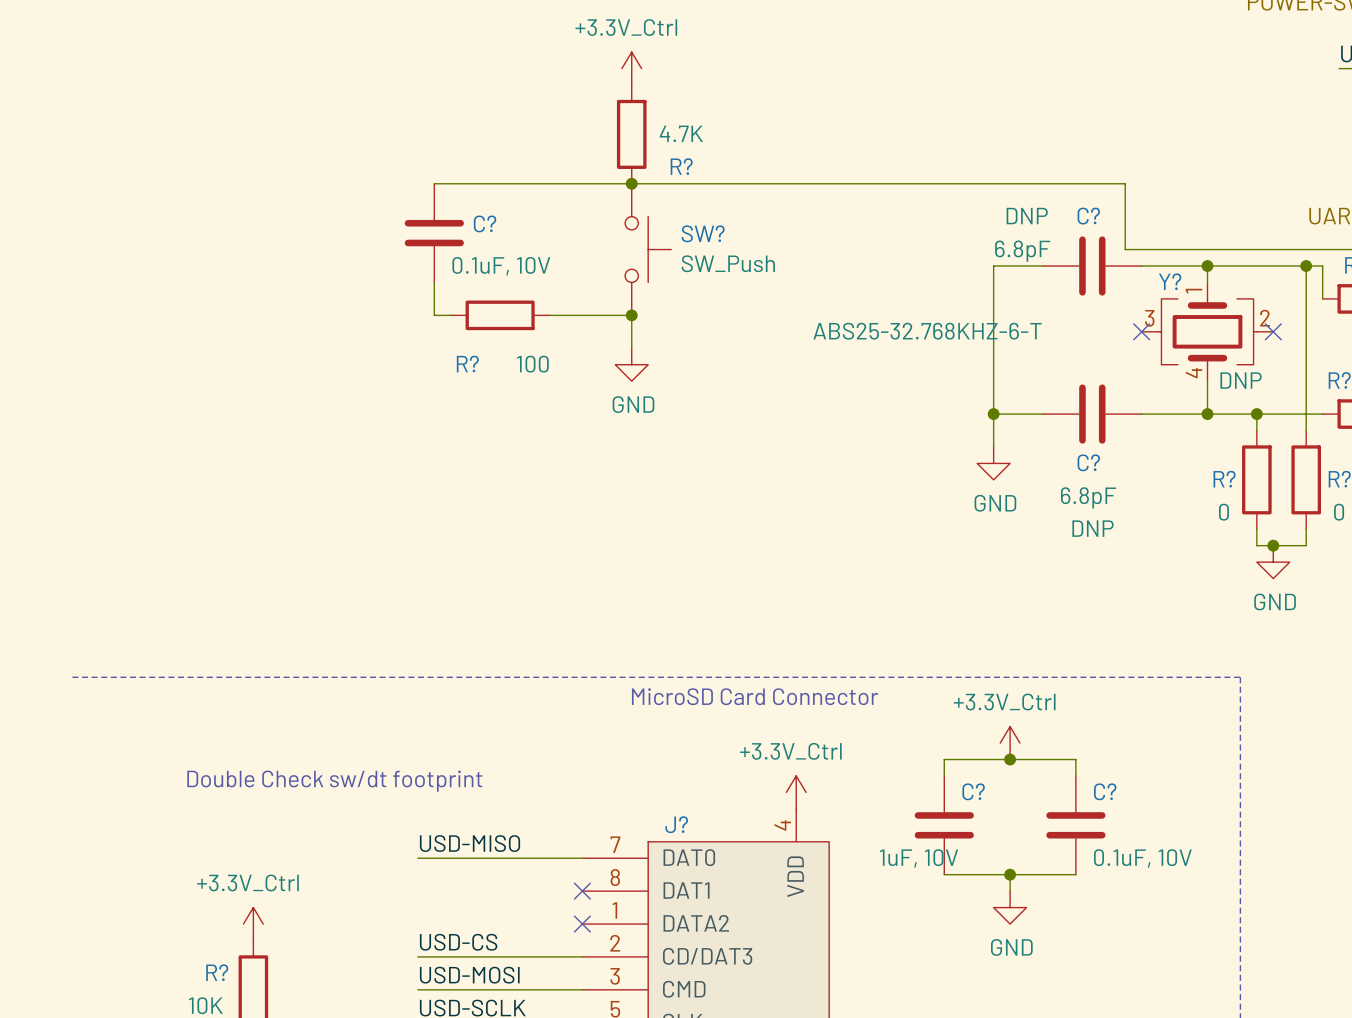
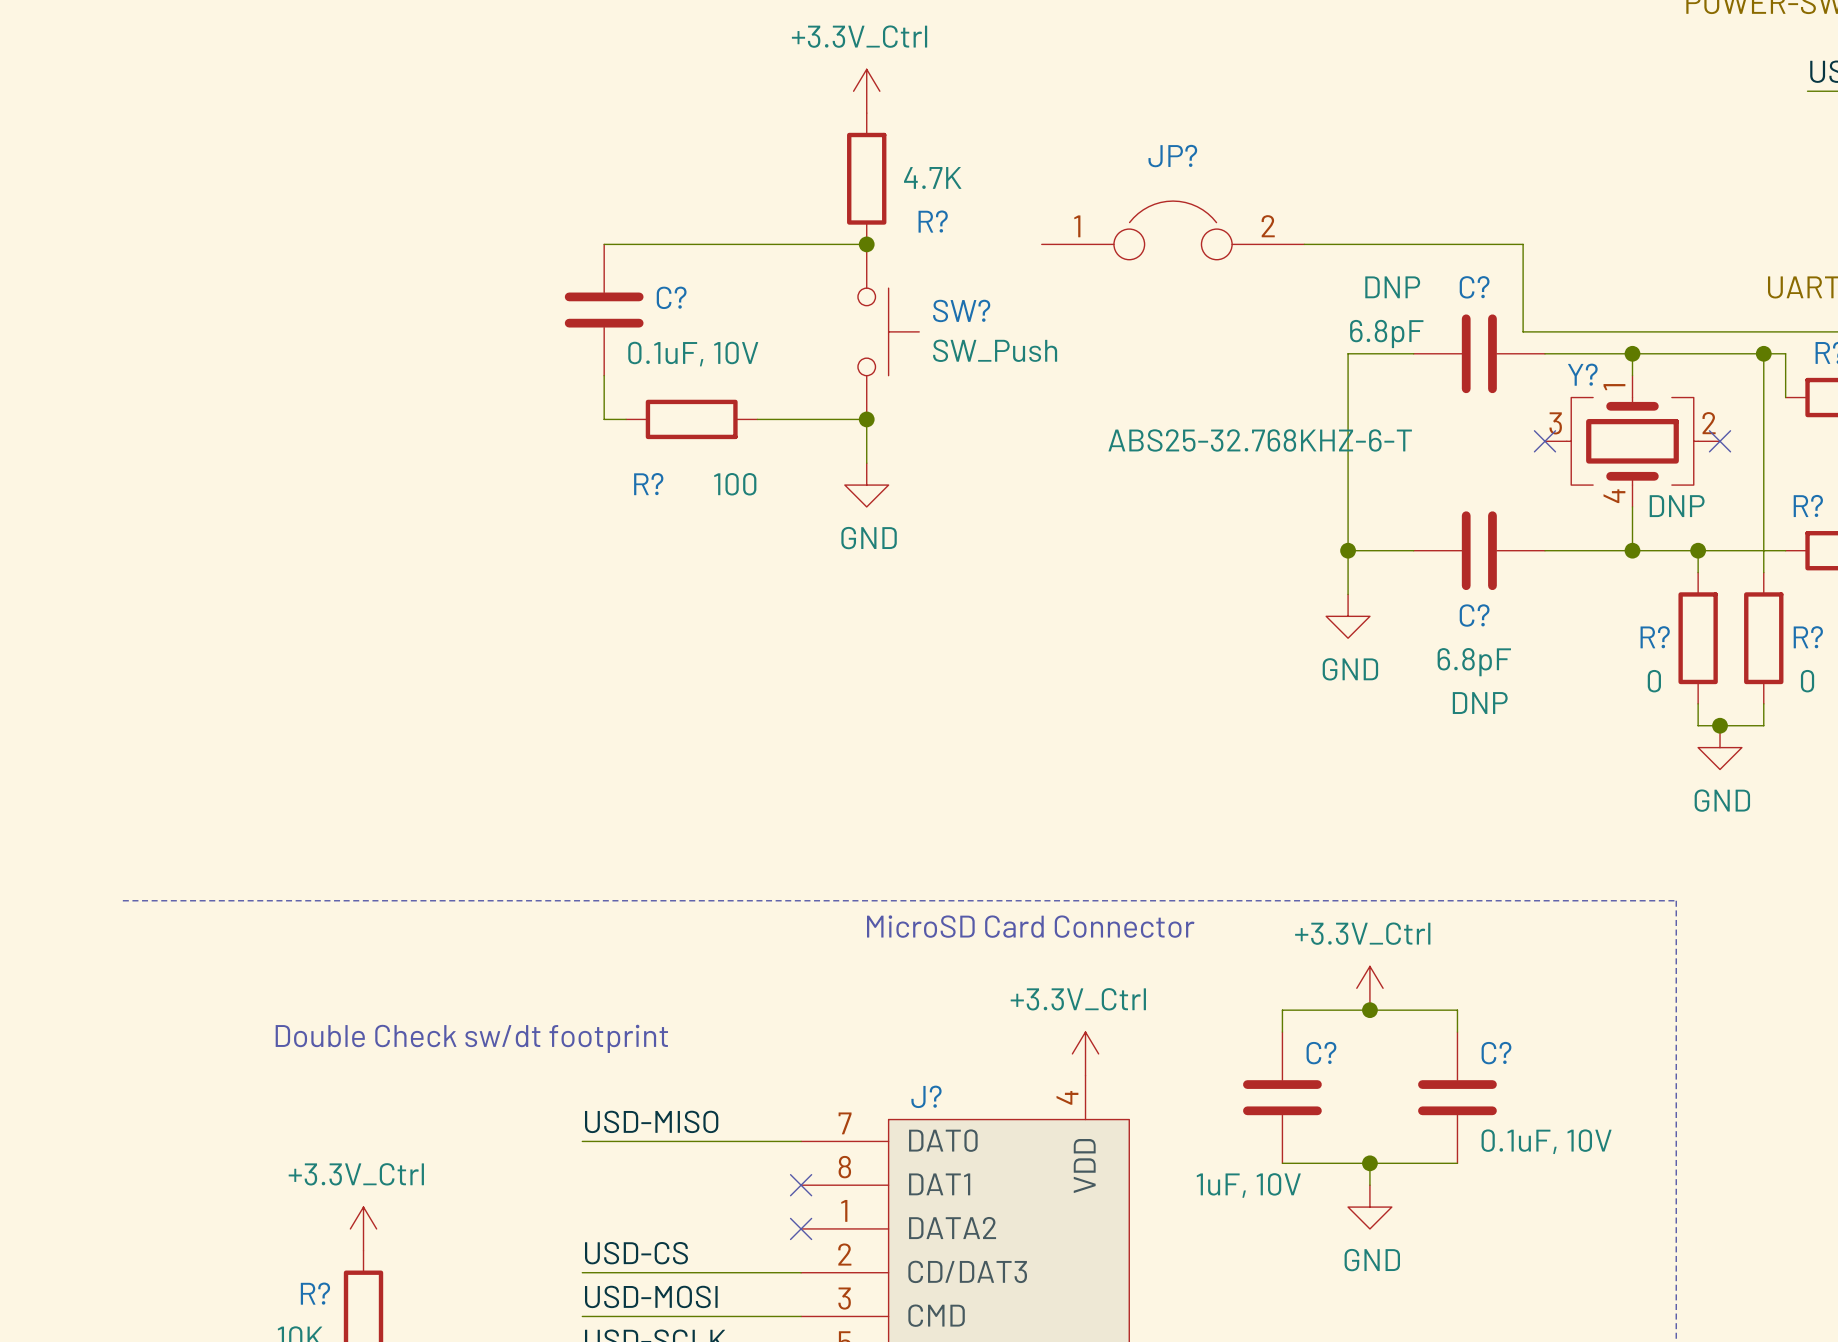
JP?: none -> (1173, 230)
wire: (631, 183) (960, 183) -> none
C? value position: 1uF, 10V (918, 858) -> 1uF, 10V (1248, 1185)

